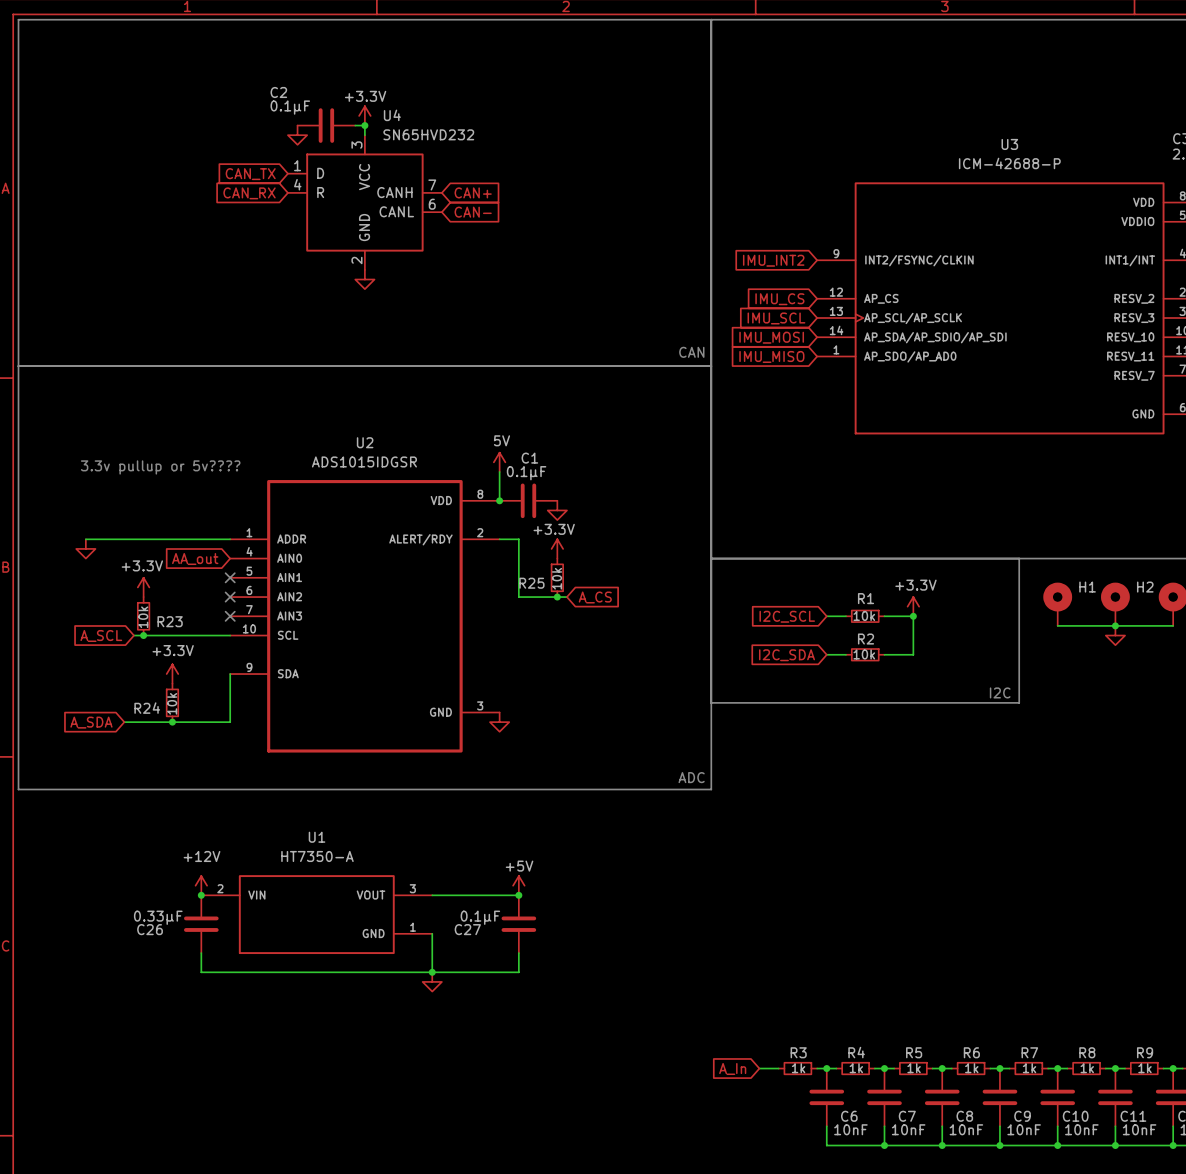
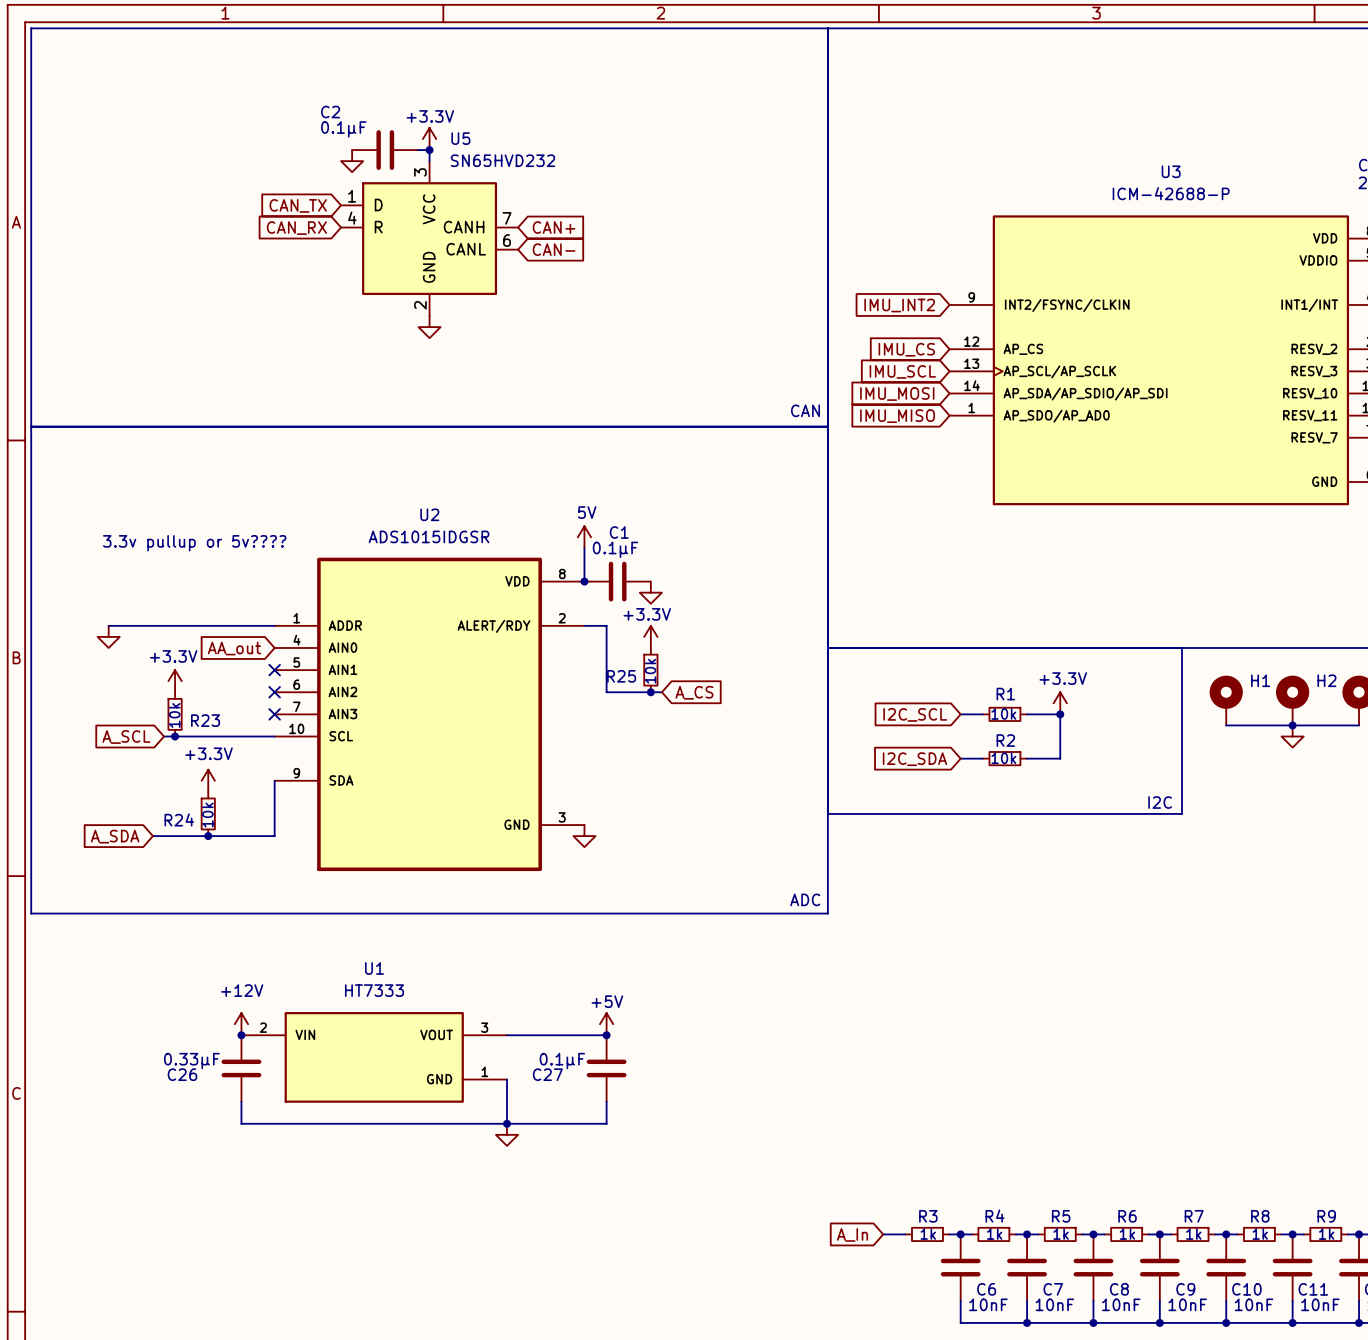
U4 name: U4 (392, 115) -> U5 (460, 138)
U1 value: HT7350-A (317, 856) -> HT7333 (374, 990)

